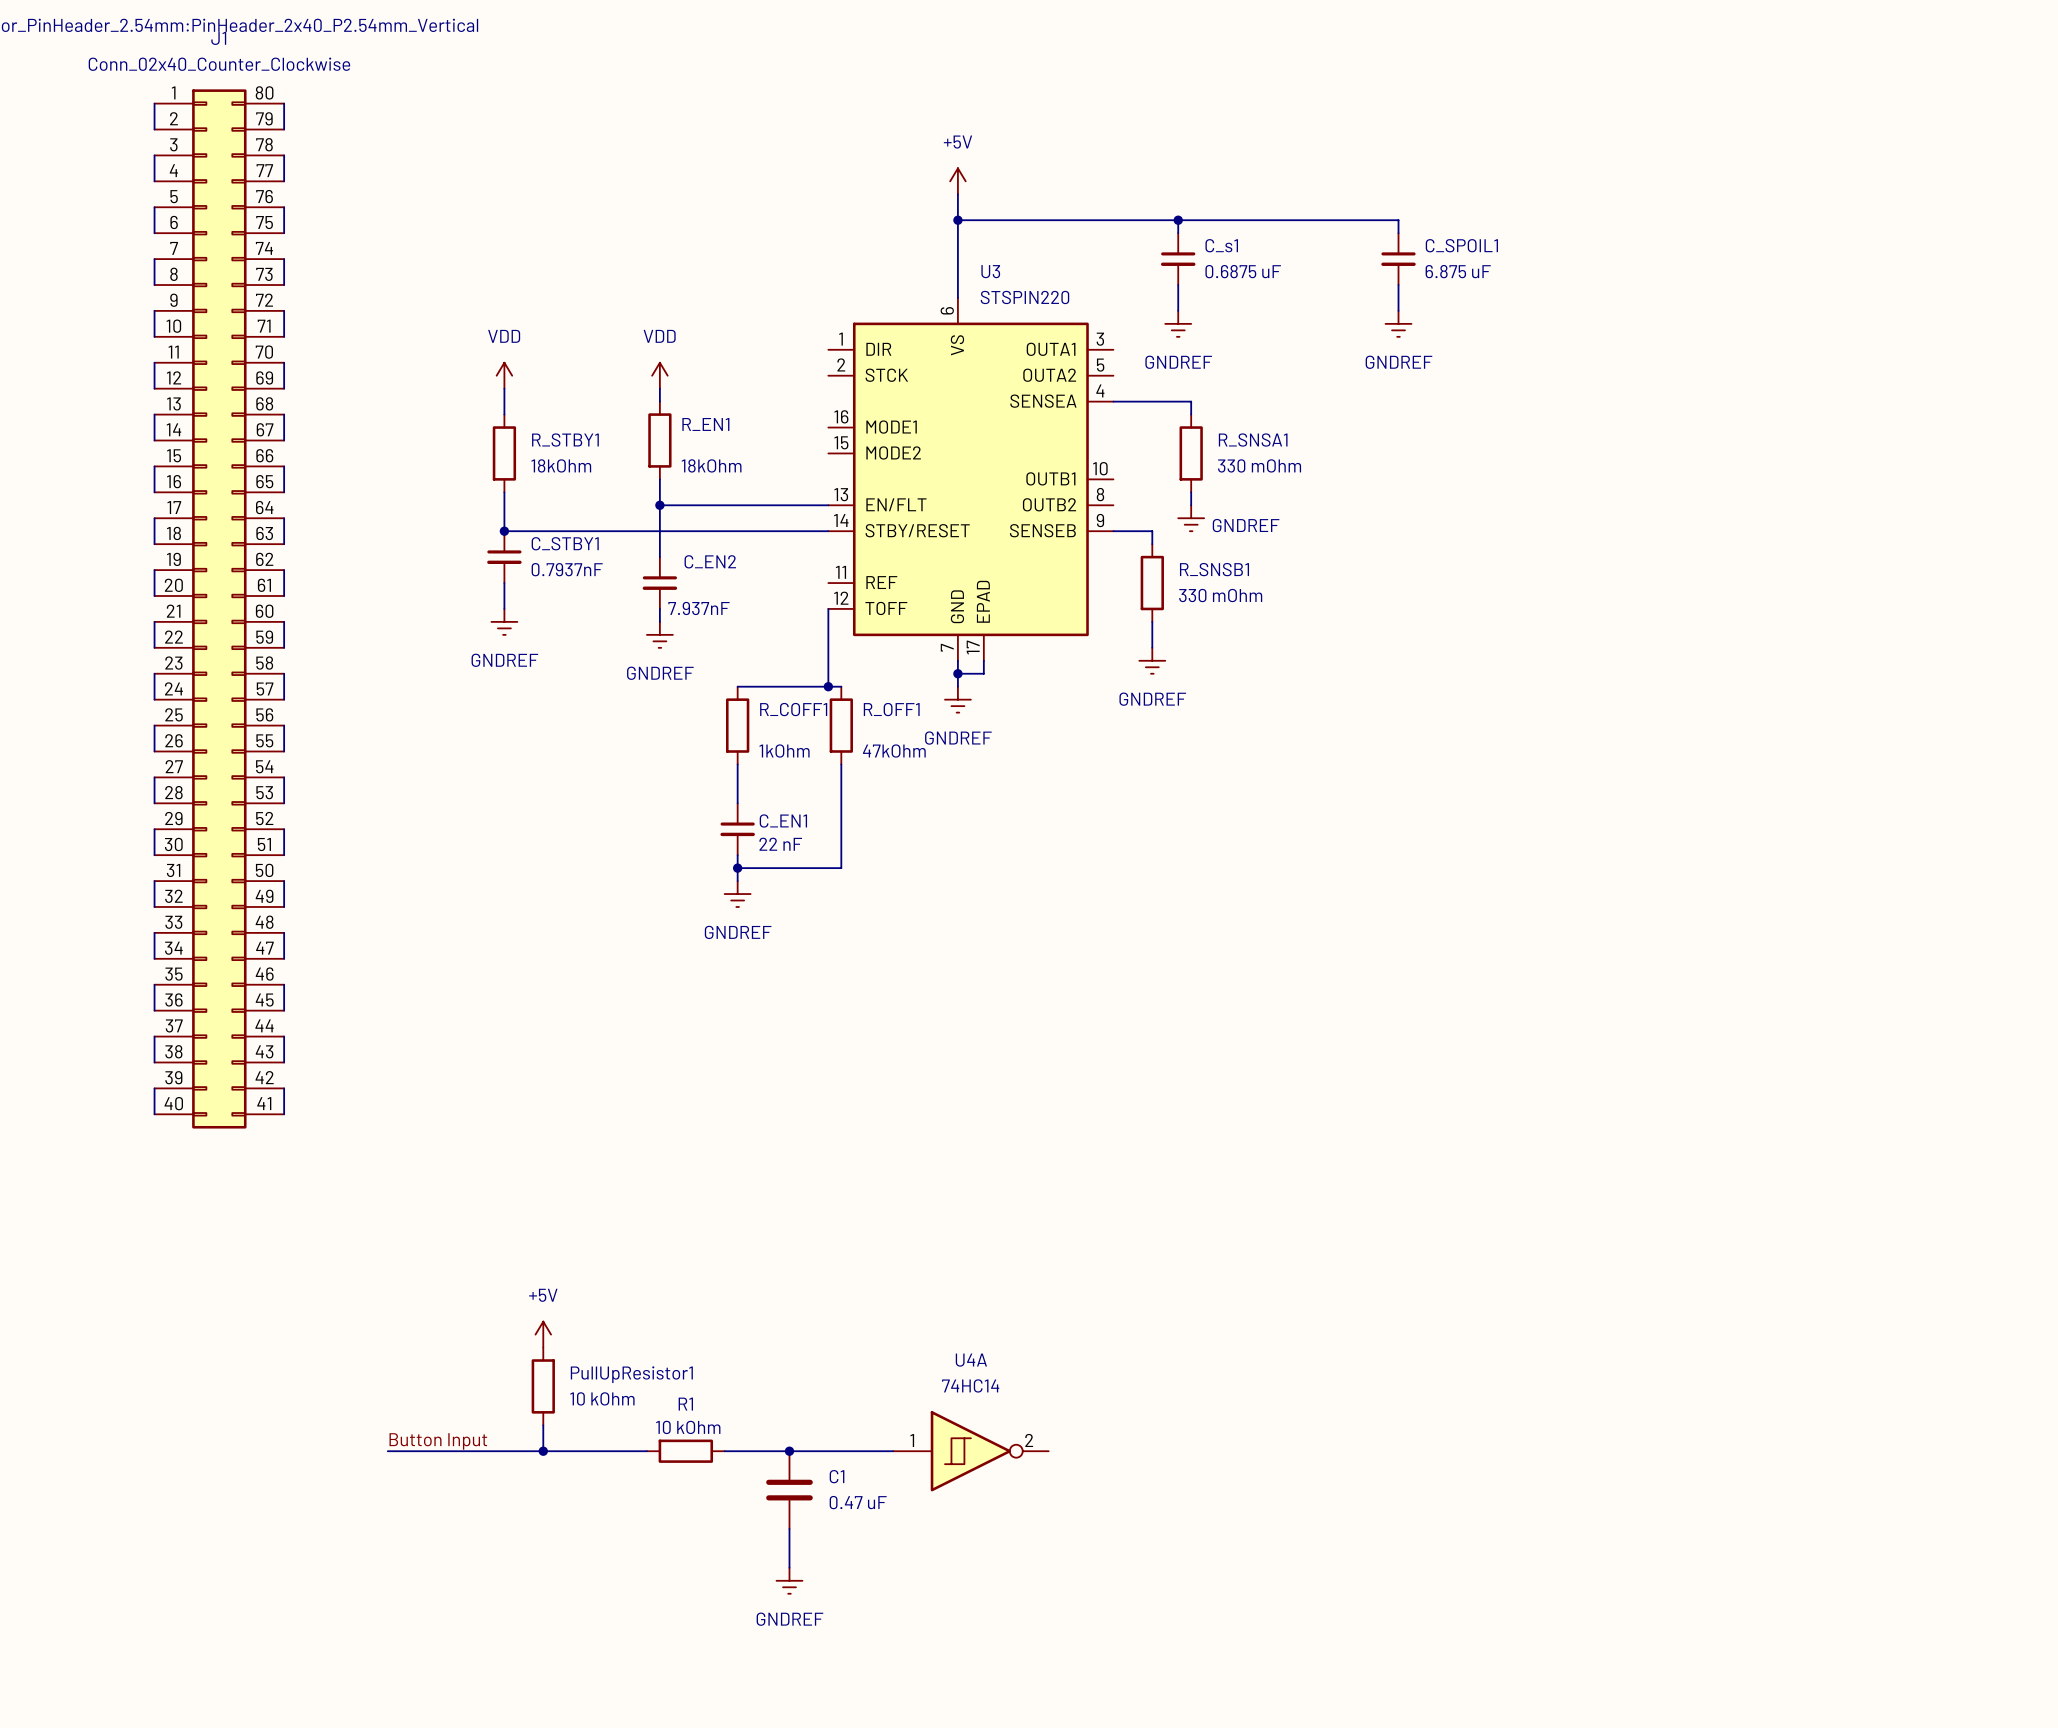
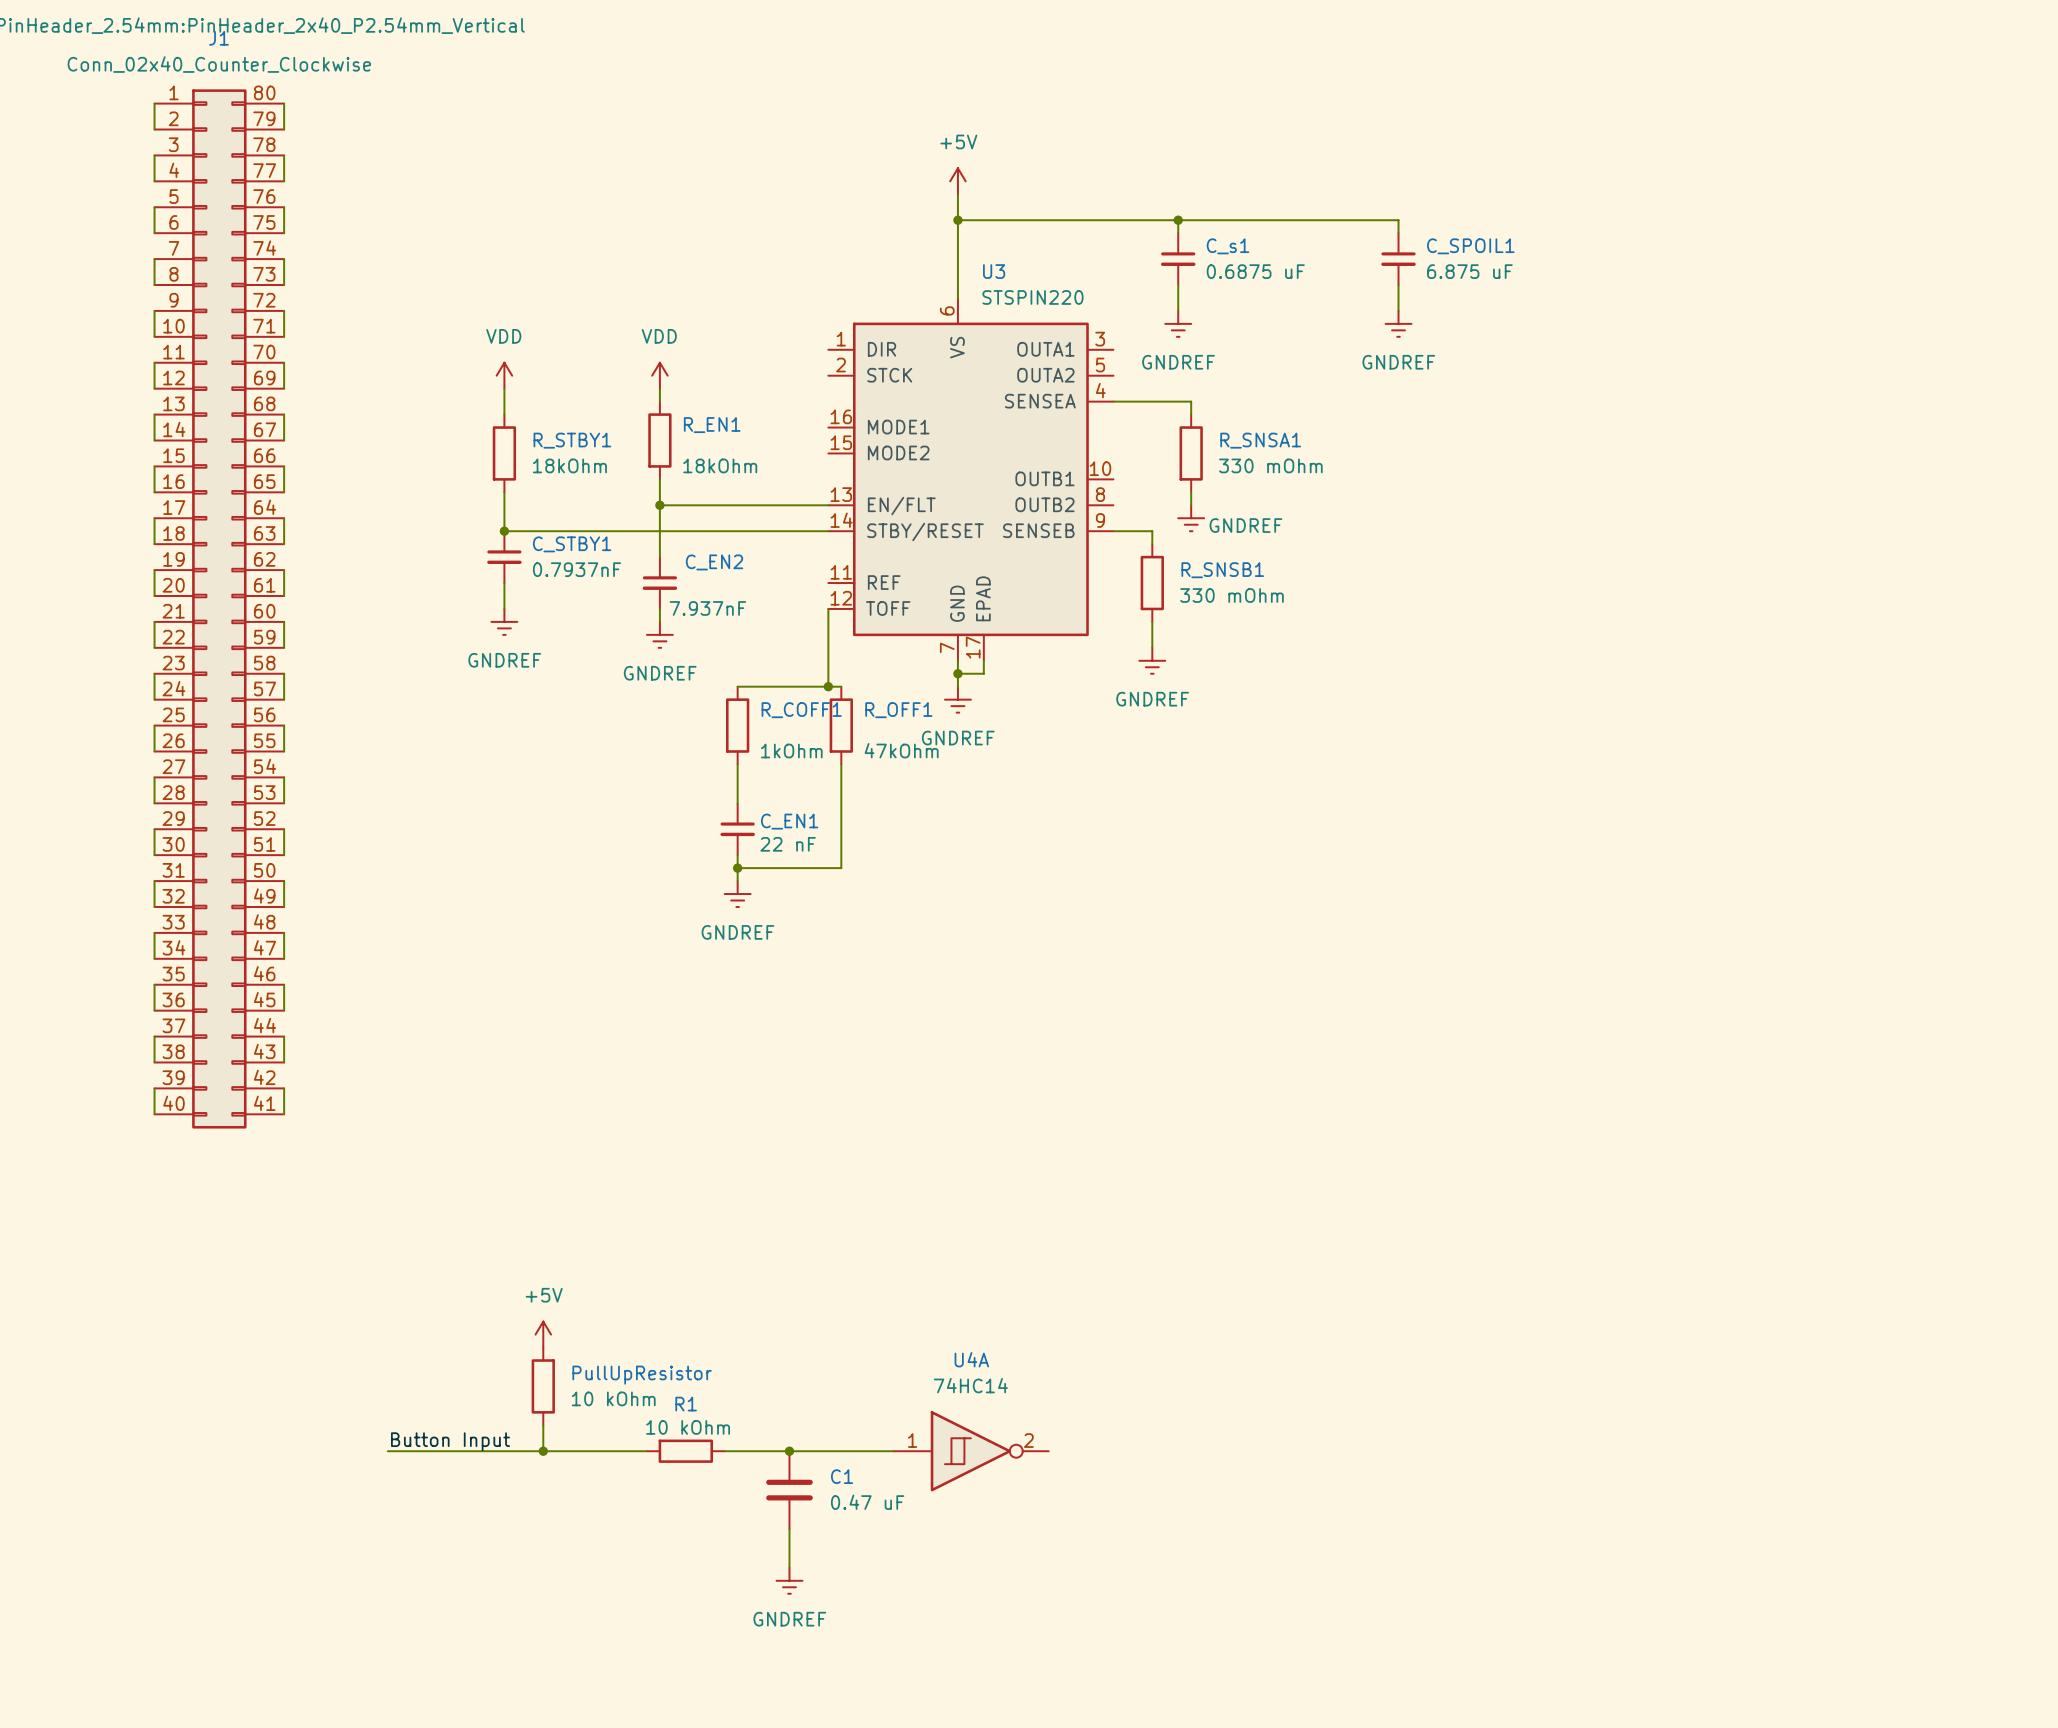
PullUpResistor1 name: PullUpResistor1 (631, 1374) -> PullUpResistor (642, 1375)

